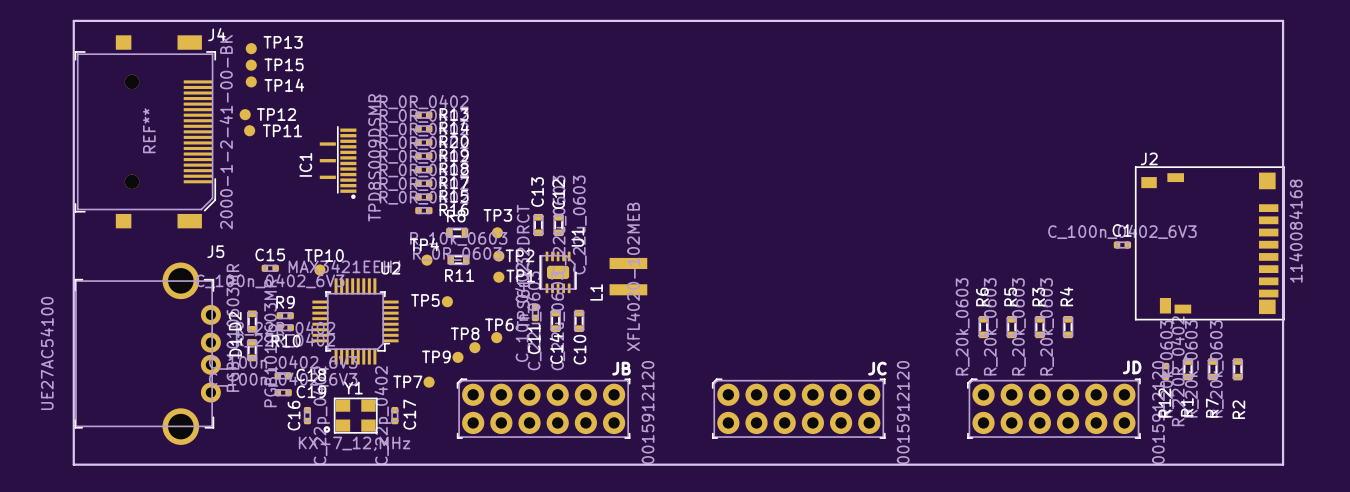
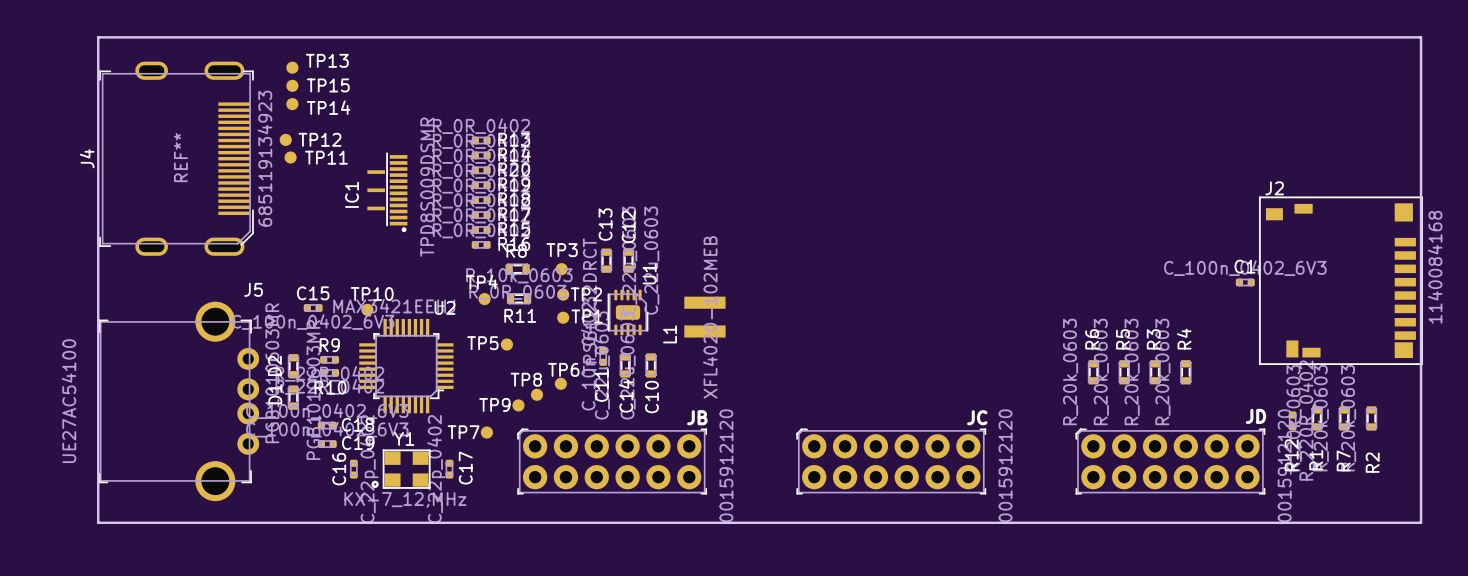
J4 name position: J4 (216, 34) -> J4 (87, 158)
J4 footprint: [74, 35, 216, 229] -> [99, 61, 254, 256]
J4 value: 2000-1-2-41-00-BK (226, 132) -> 685119134923 (264, 158)

